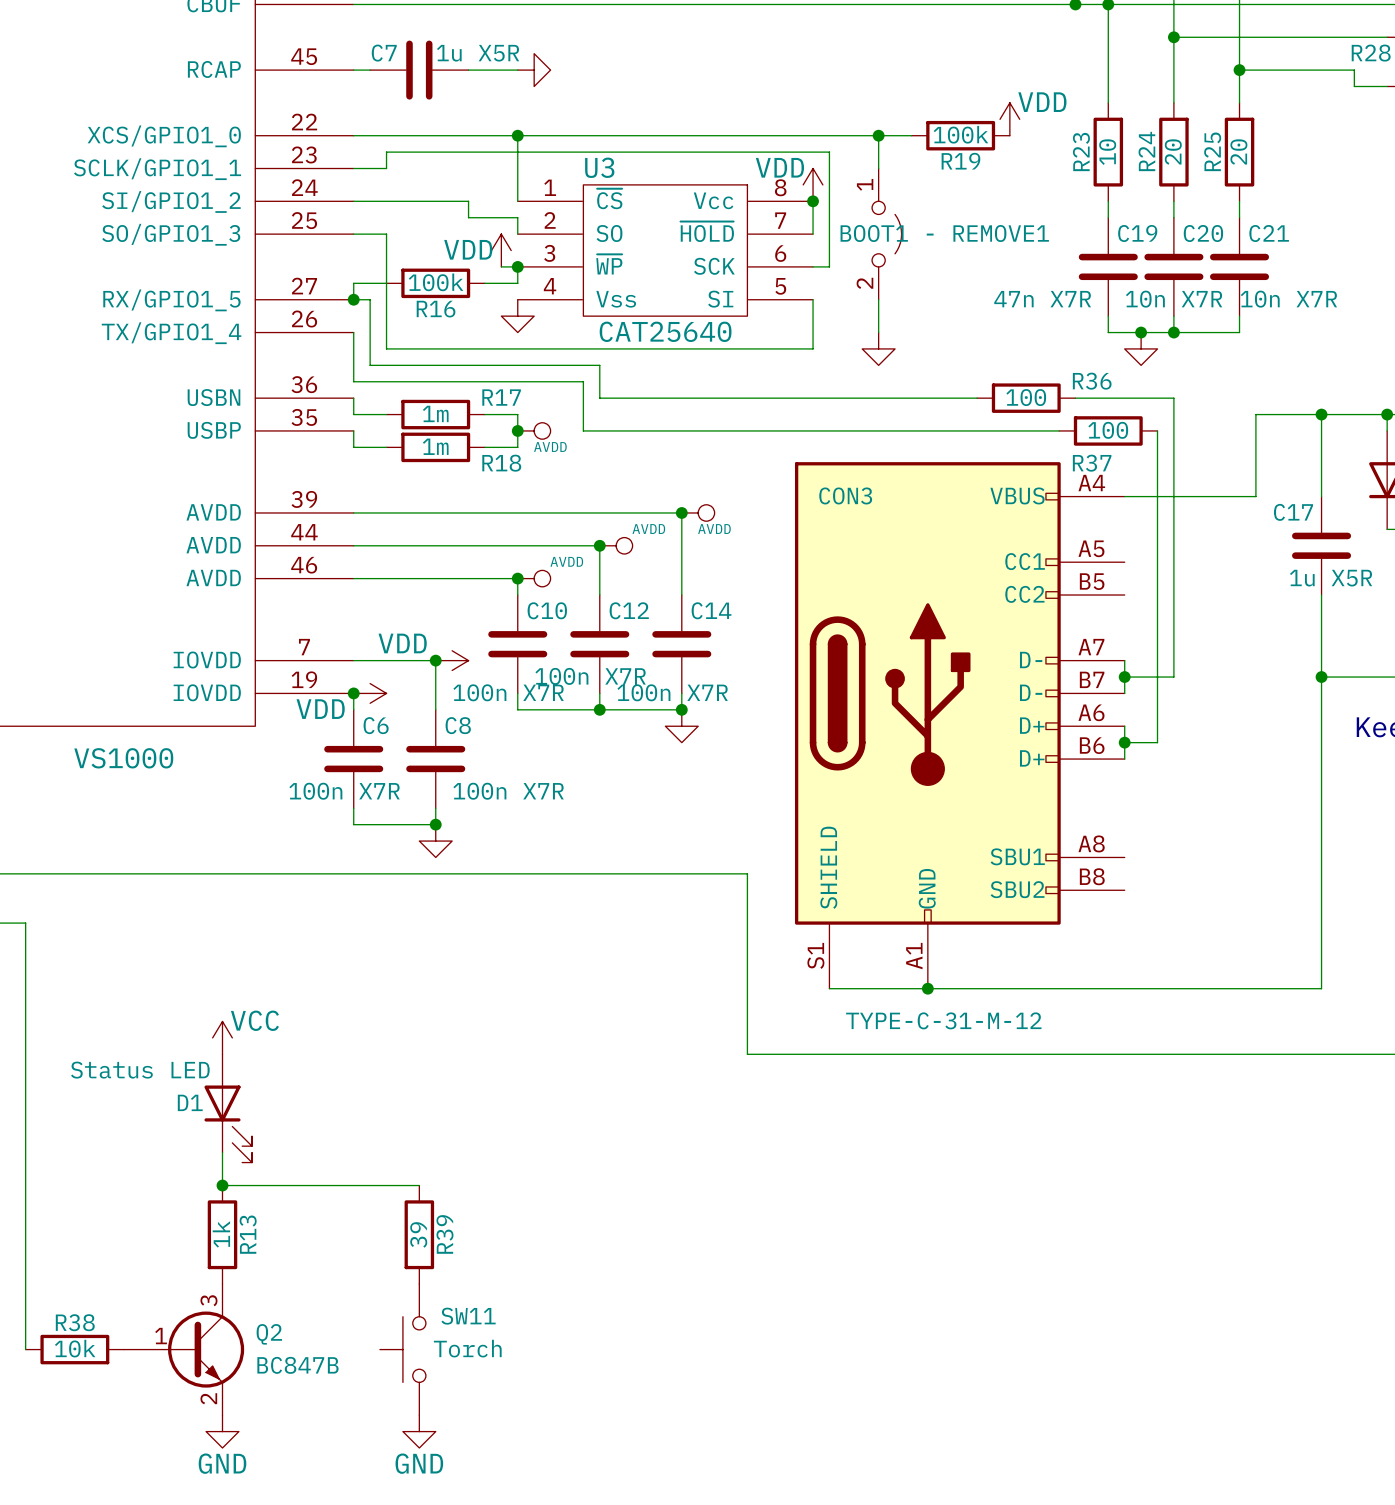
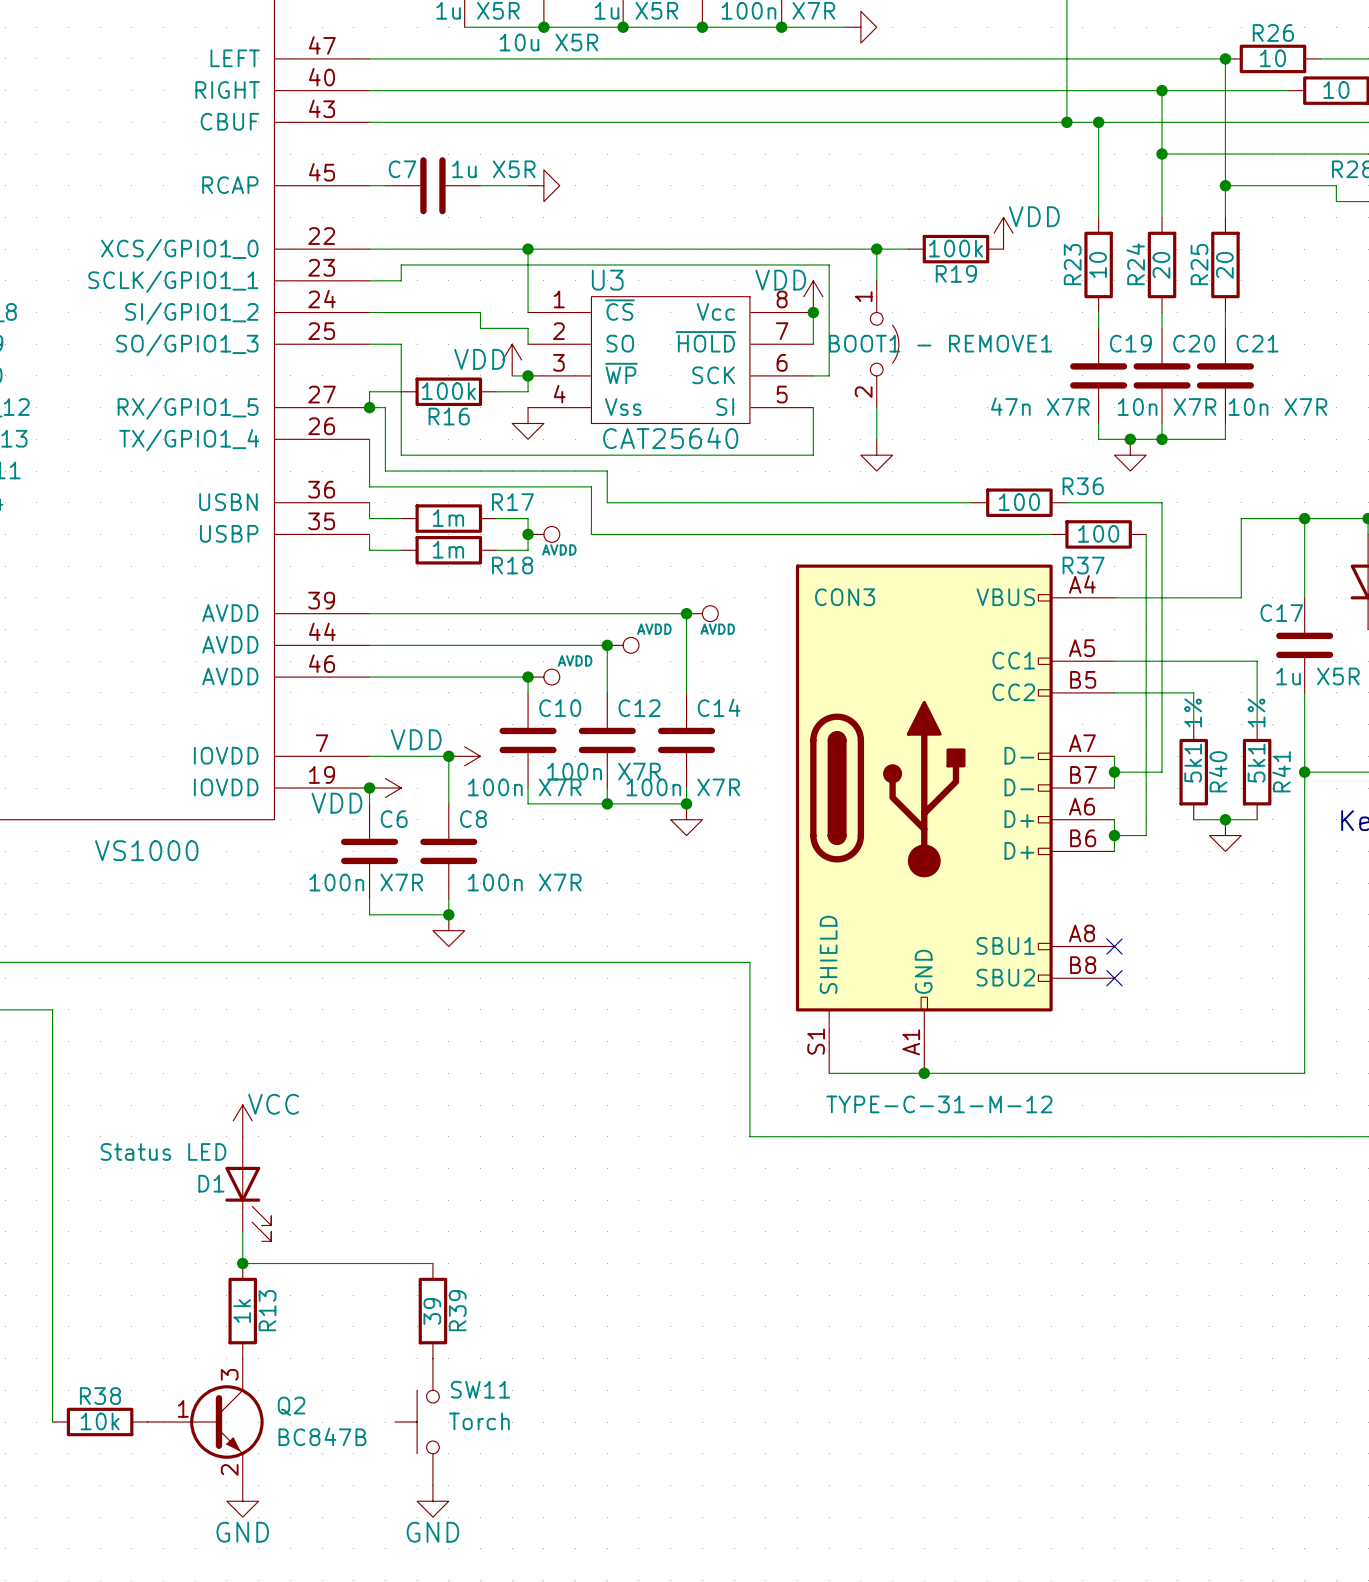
wire: none -> (1114, 661) (1257, 661) (1257, 724)
wire: none -> (1114, 692) (1193, 692) (1193, 724)
R40: none -> 5k1 1% (1193, 772)
R41: none -> 5k1 1% (1257, 772)
wire: none -> (1193, 819) (1257, 819)
junction: none -> (1225, 819)
power symbol: none -> (1225, 835)
no-connect mark: none -> (1114, 946)
no-connect mark: none -> (1114, 978)

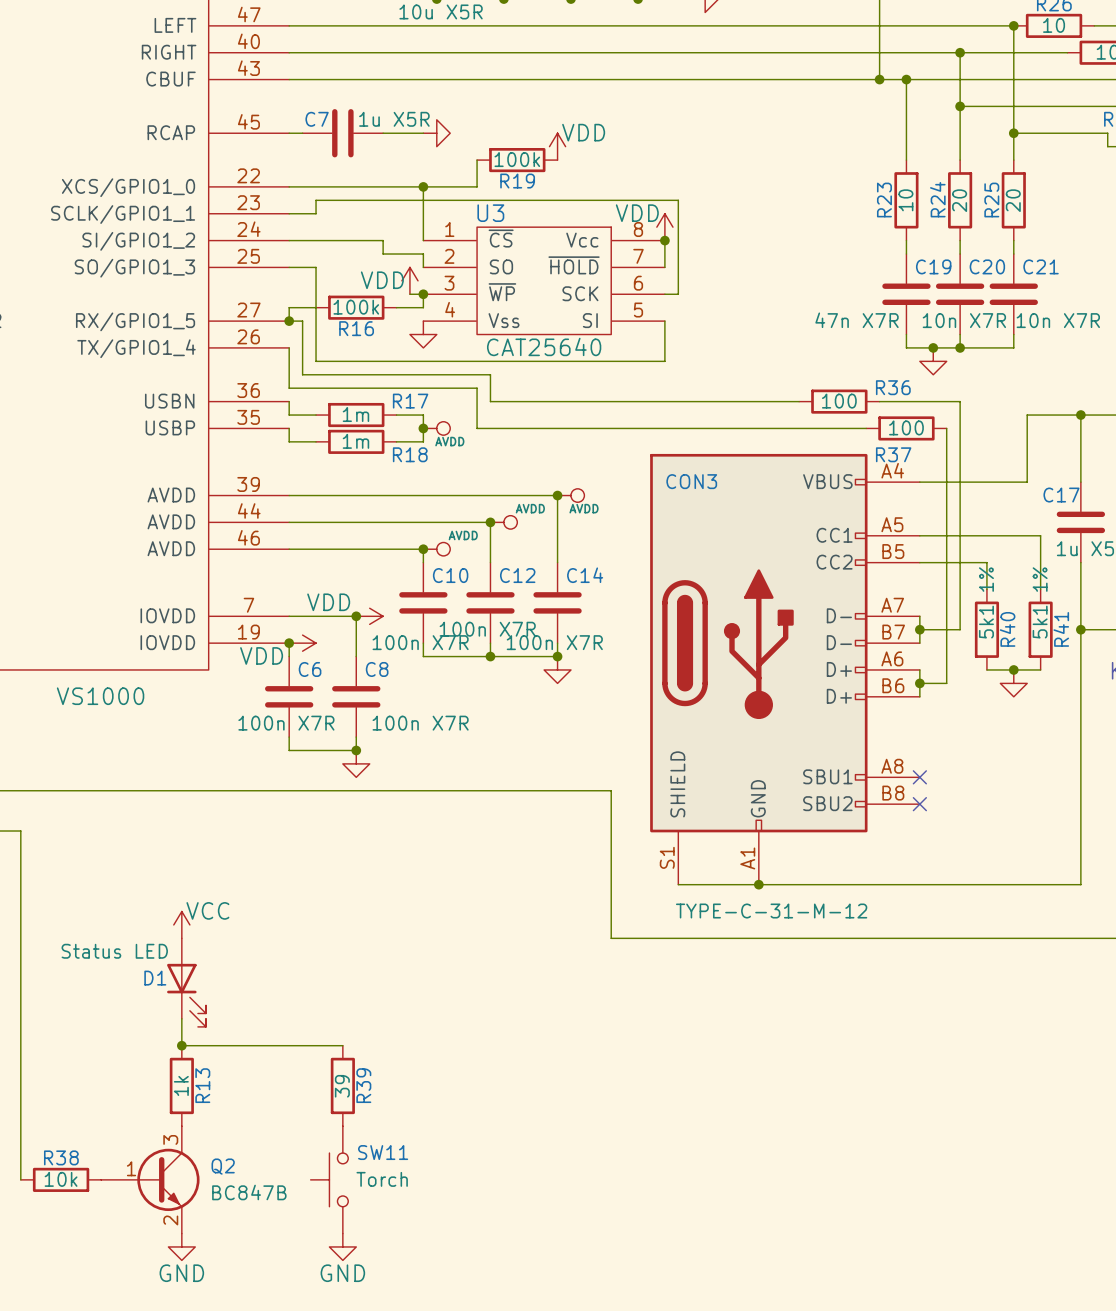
power symbol: none -> VDD (557, 146)
power symbol: VDD (1003, 233) -> none
wire: (591, 249) (908, 249) -> (477, 186) (477, 160)
wire: (876, 249) (876, 280) -> none
junction: (876, 249) -> none
R19 position: (955, 249) -> (517, 160)
BOOT1 - REMOVE1: (884, 344) -> none
wire: (876, 407) (876, 439) -> none
power symbol: (876, 455) -> none

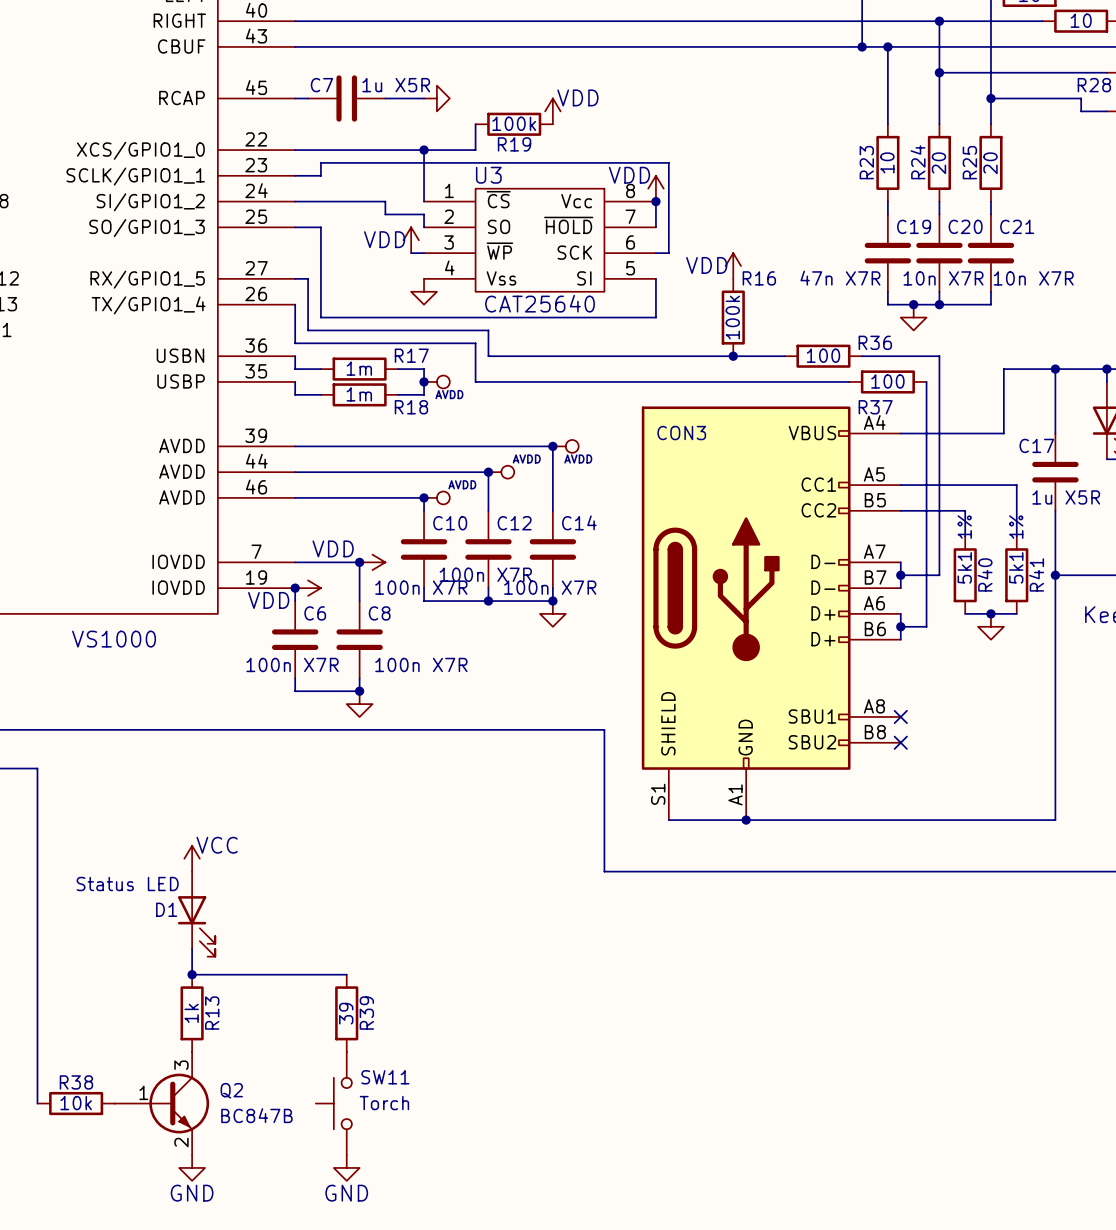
wire: (423, 294) (423, 307) (396, 307) -> none
junction: (423, 294) -> none
wire: (316, 307) (289, 307) (289, 321) -> none
R16 rotation: 0° (356, 307) -> 90° clockwise (733, 317)
R16 position: (356, 307) -> (733, 317)
power symbol: none -> VDD (733, 266)
junction: (289, 321) -> none
R16 name position: R16 (356, 328) -> R16 (759, 278)
junction: none -> (733, 356)
CON3 value: TYPE-C-31-M-12 (771, 911) -> none

